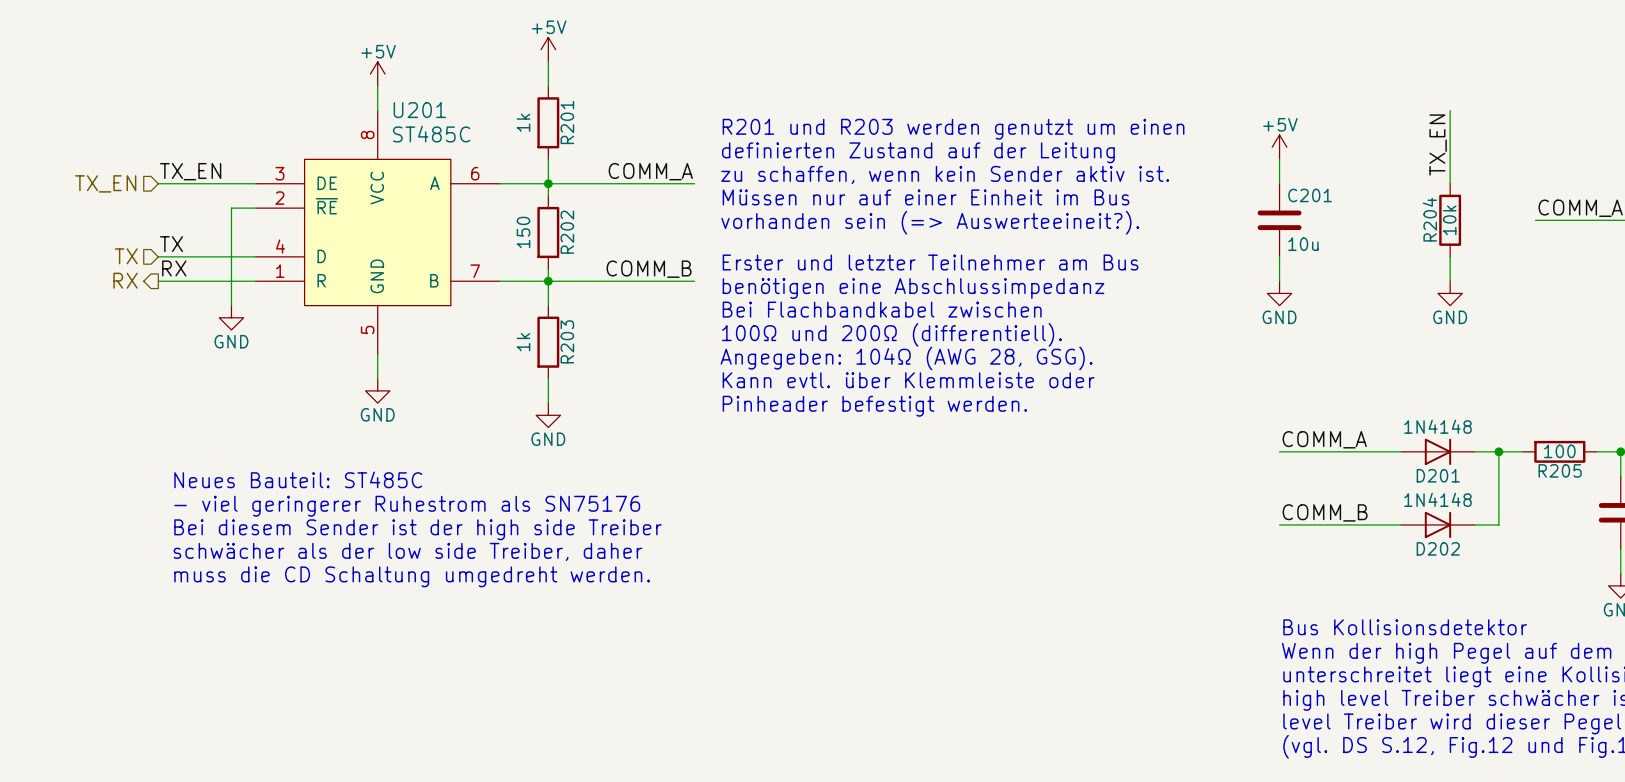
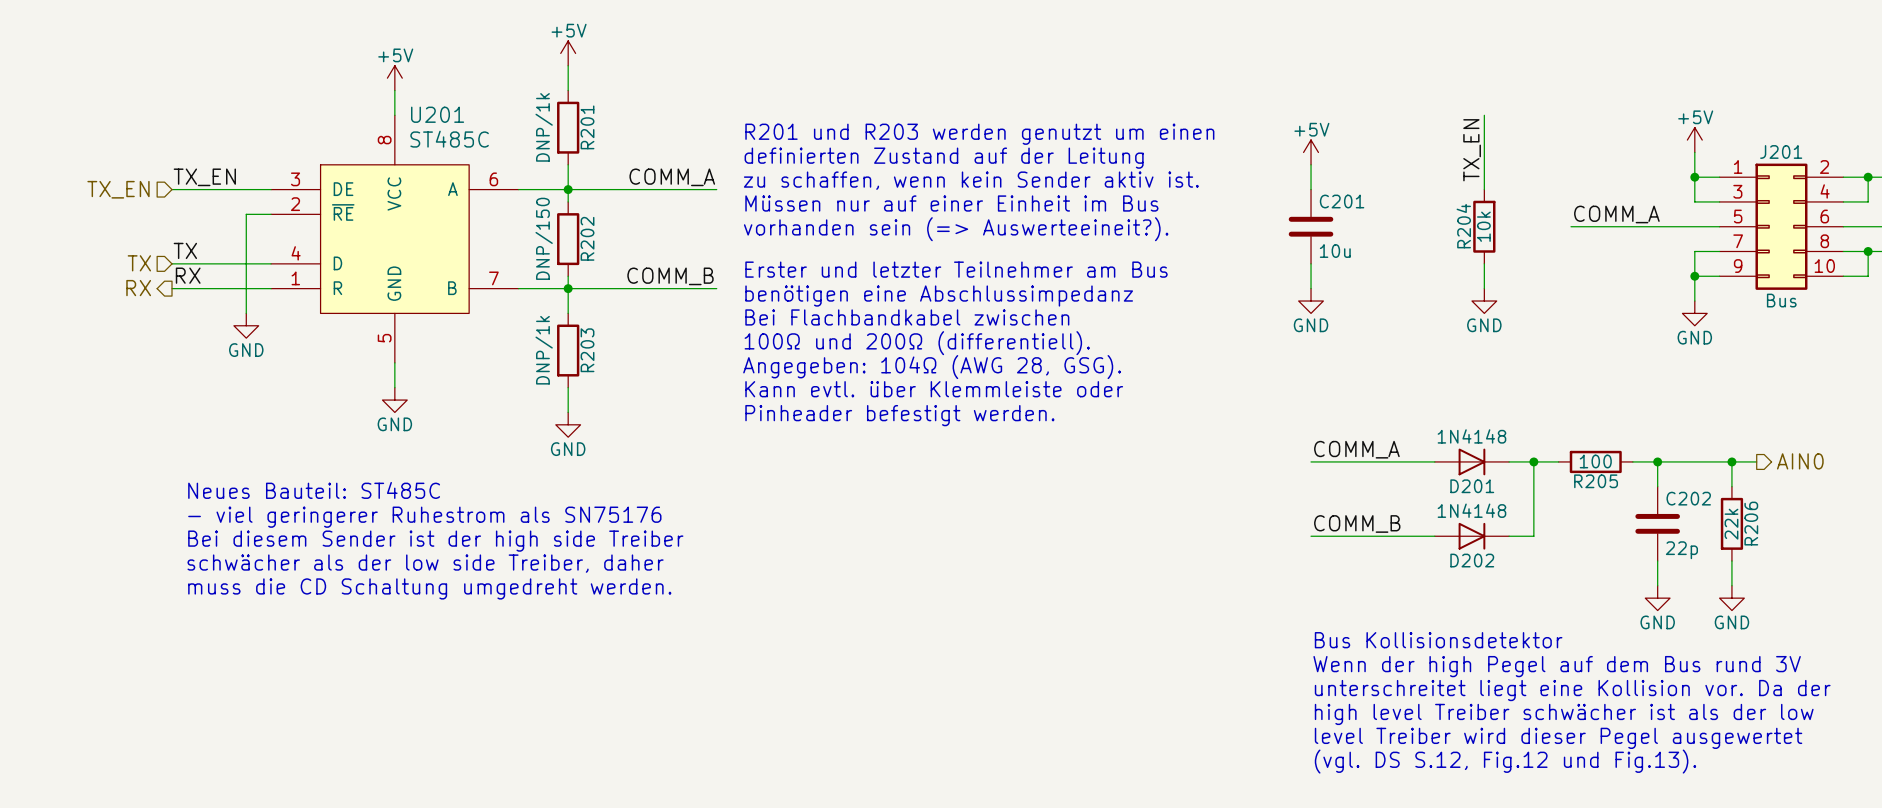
R201 value: 1k (523, 122) -> DNP/1k (544, 127)
R202 value: 150 (523, 232) -> DNP/150 (544, 238)
R203 value: 1k (523, 342) -> DNP/1k (544, 350)

